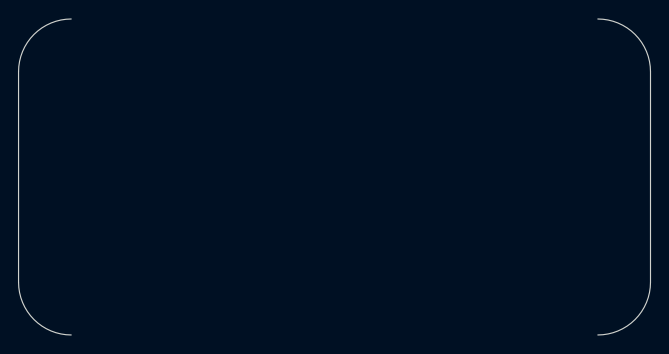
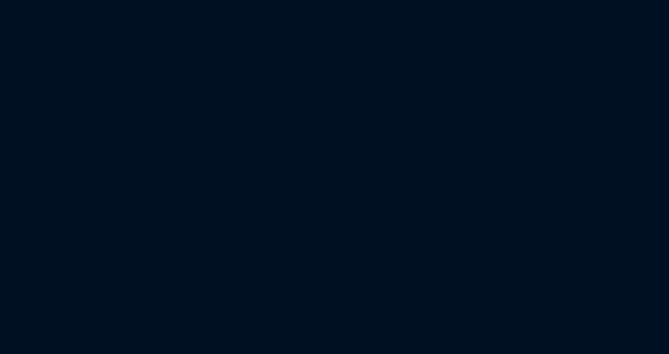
board edge: (71, 18) (51, 23) (33, 34) (22, 51) (18, 71) (19, 292) (24, 307) (37, 323) (51, 330) (71, 334) -> none
board edge: (597, 18) (617, 23) (635, 34) (646, 51) (650, 71) (649, 292) (641, 311) (631, 323) (617, 330) (597, 334) -> none

